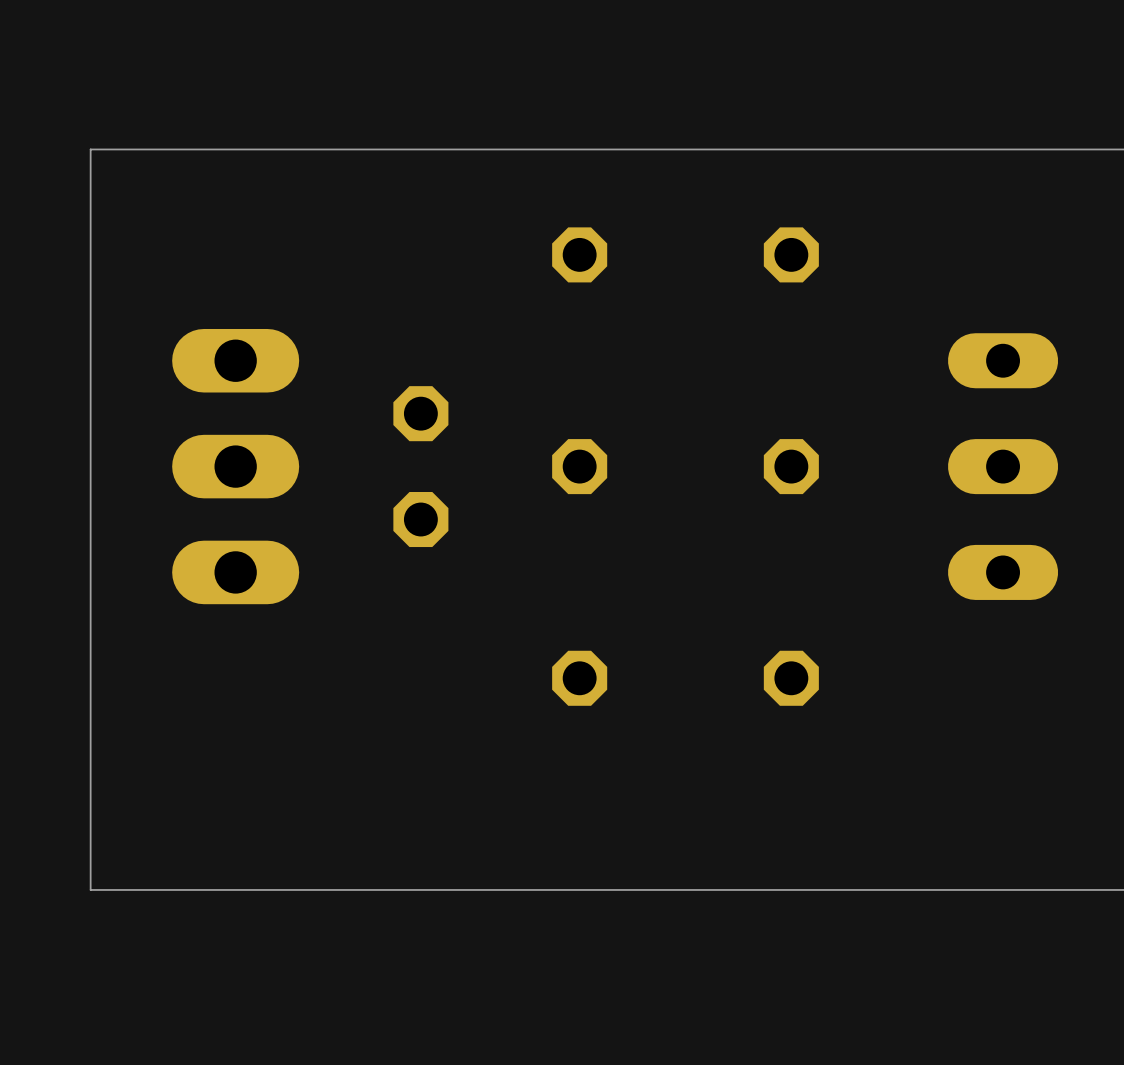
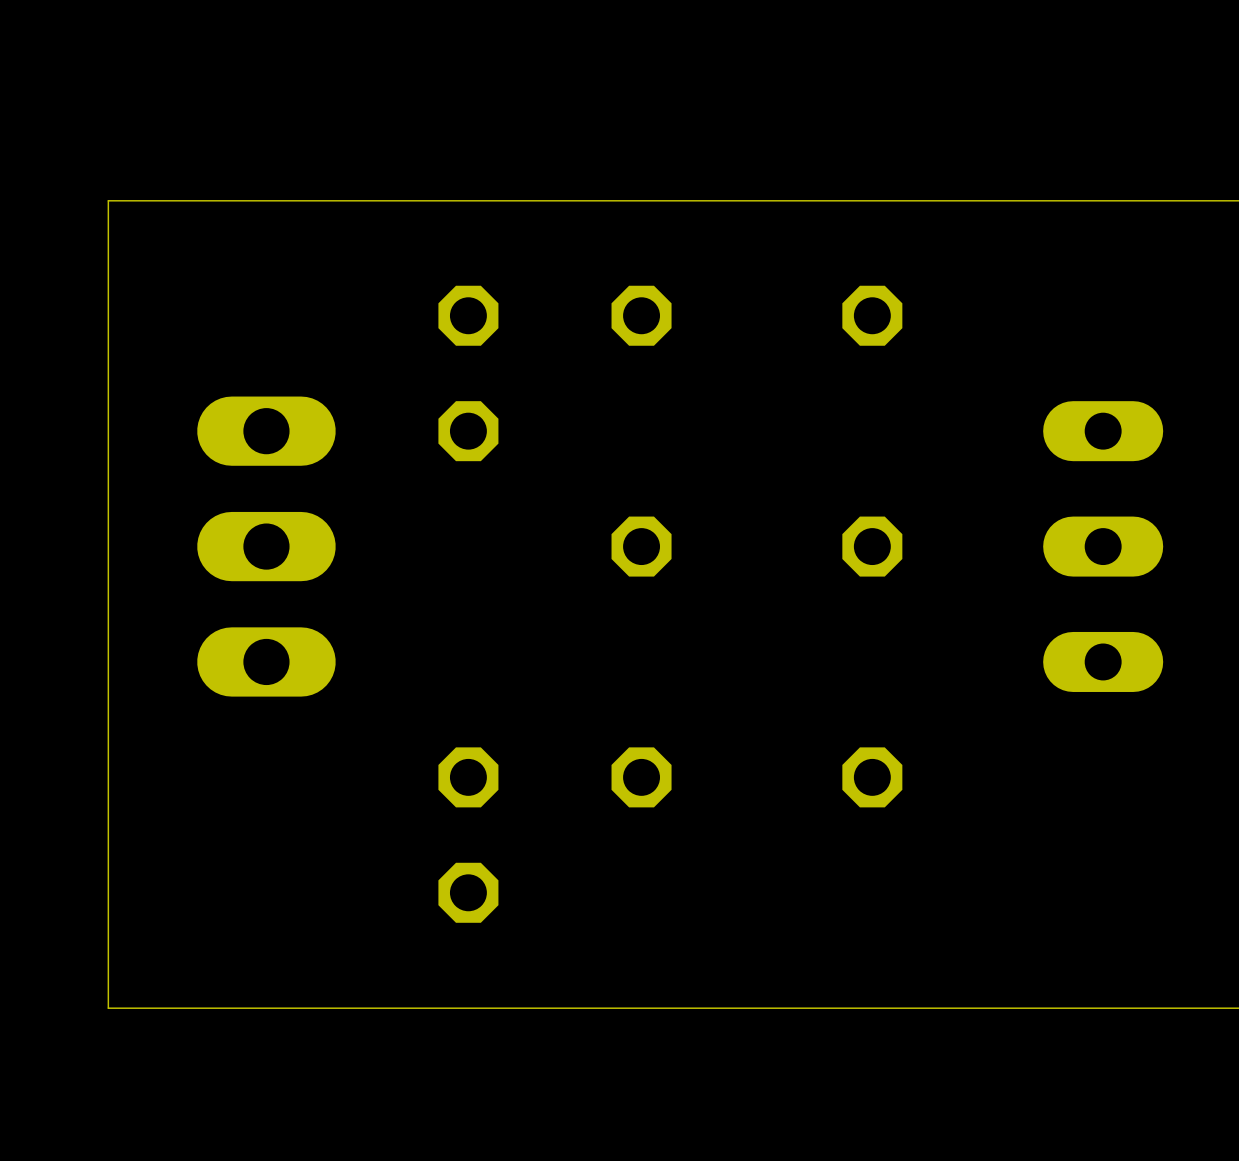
part: none -> (468, 373)
part: (420, 466) -> none
part: none -> (468, 835)

